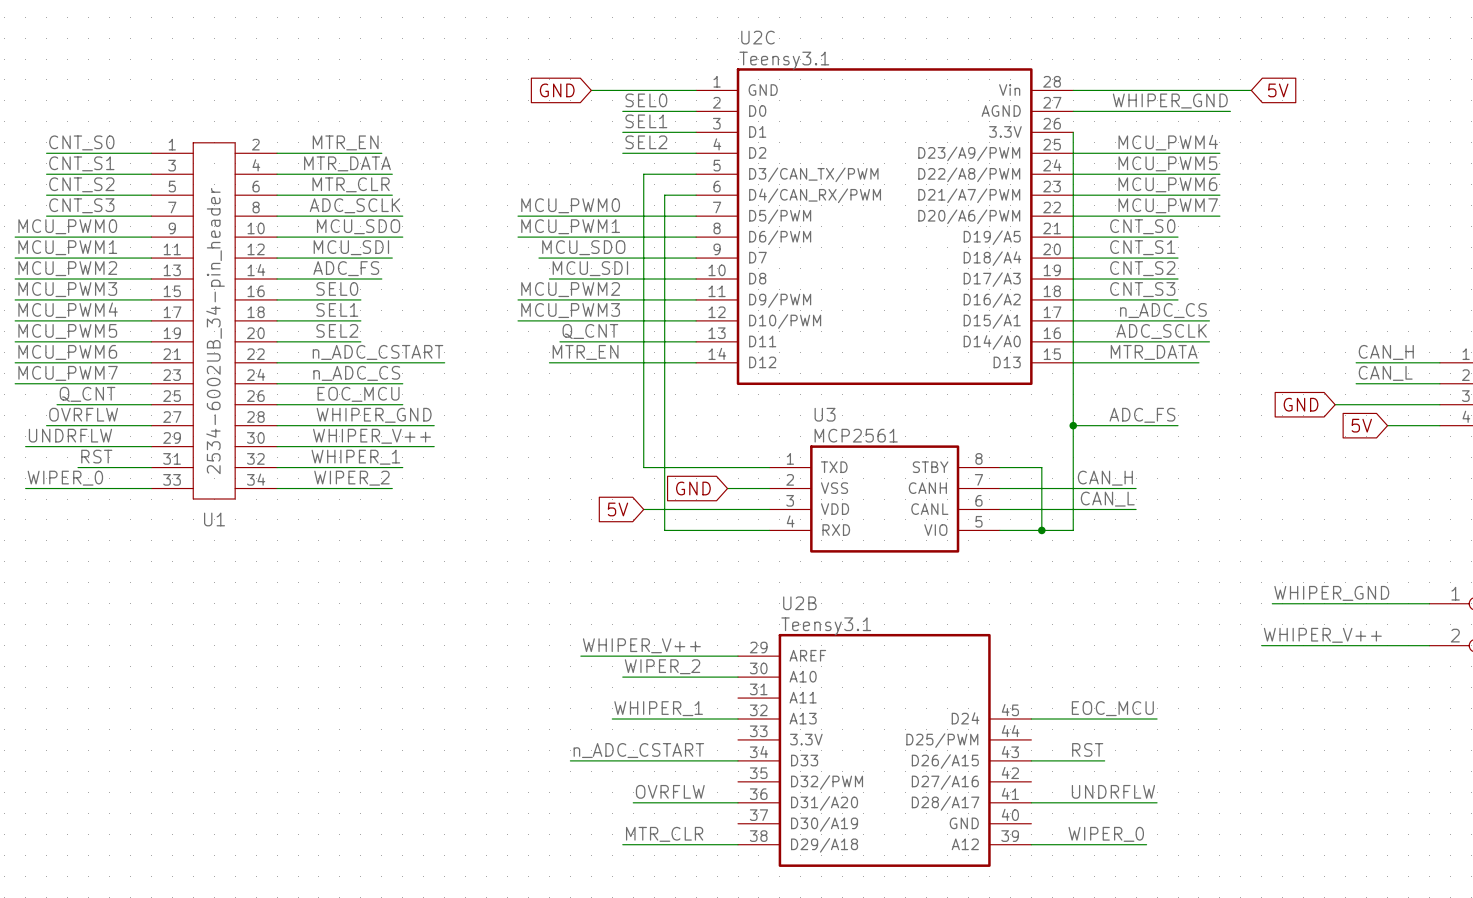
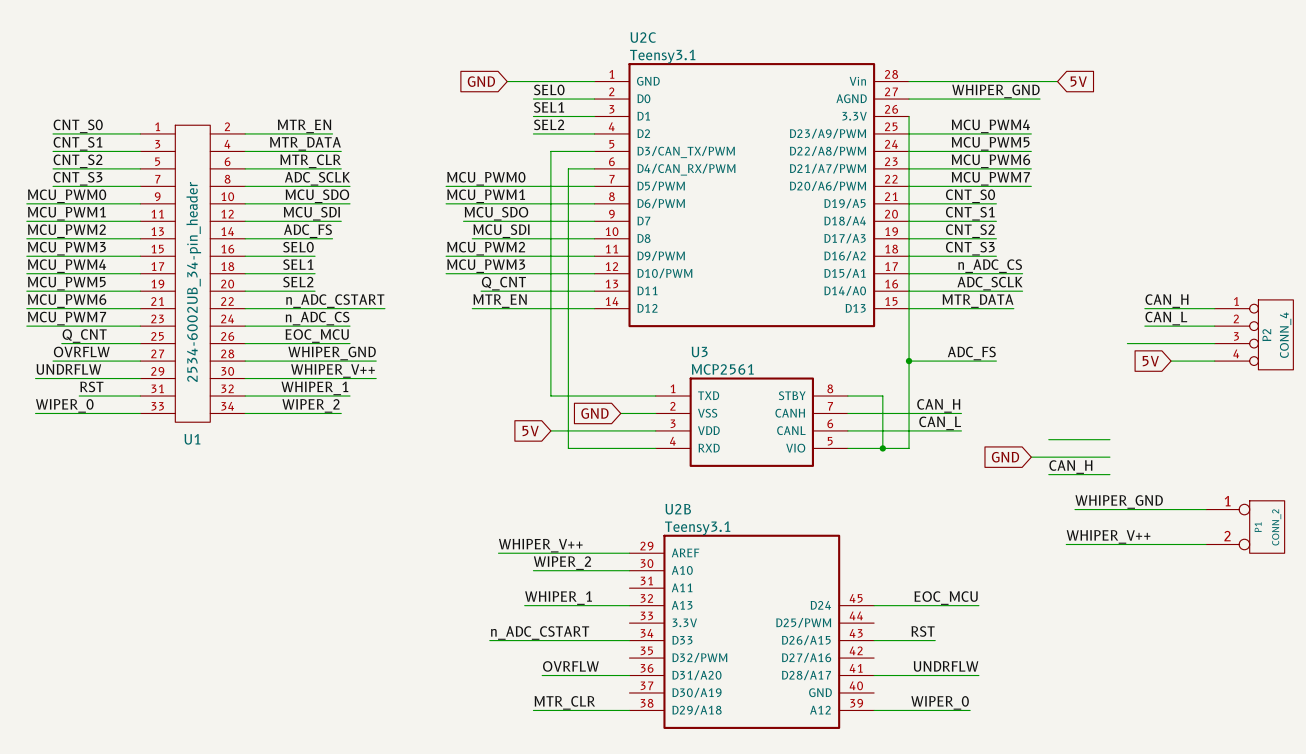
global label position: GND (1301, 404) -> GND (1005, 457)
wire: none -> (1048, 439) (1109, 439)
wire: none -> (1031, 457) (1109, 457)
label: none -> CAN_H (1070, 467)
wire: none -> (1048, 474) (1109, 474)

